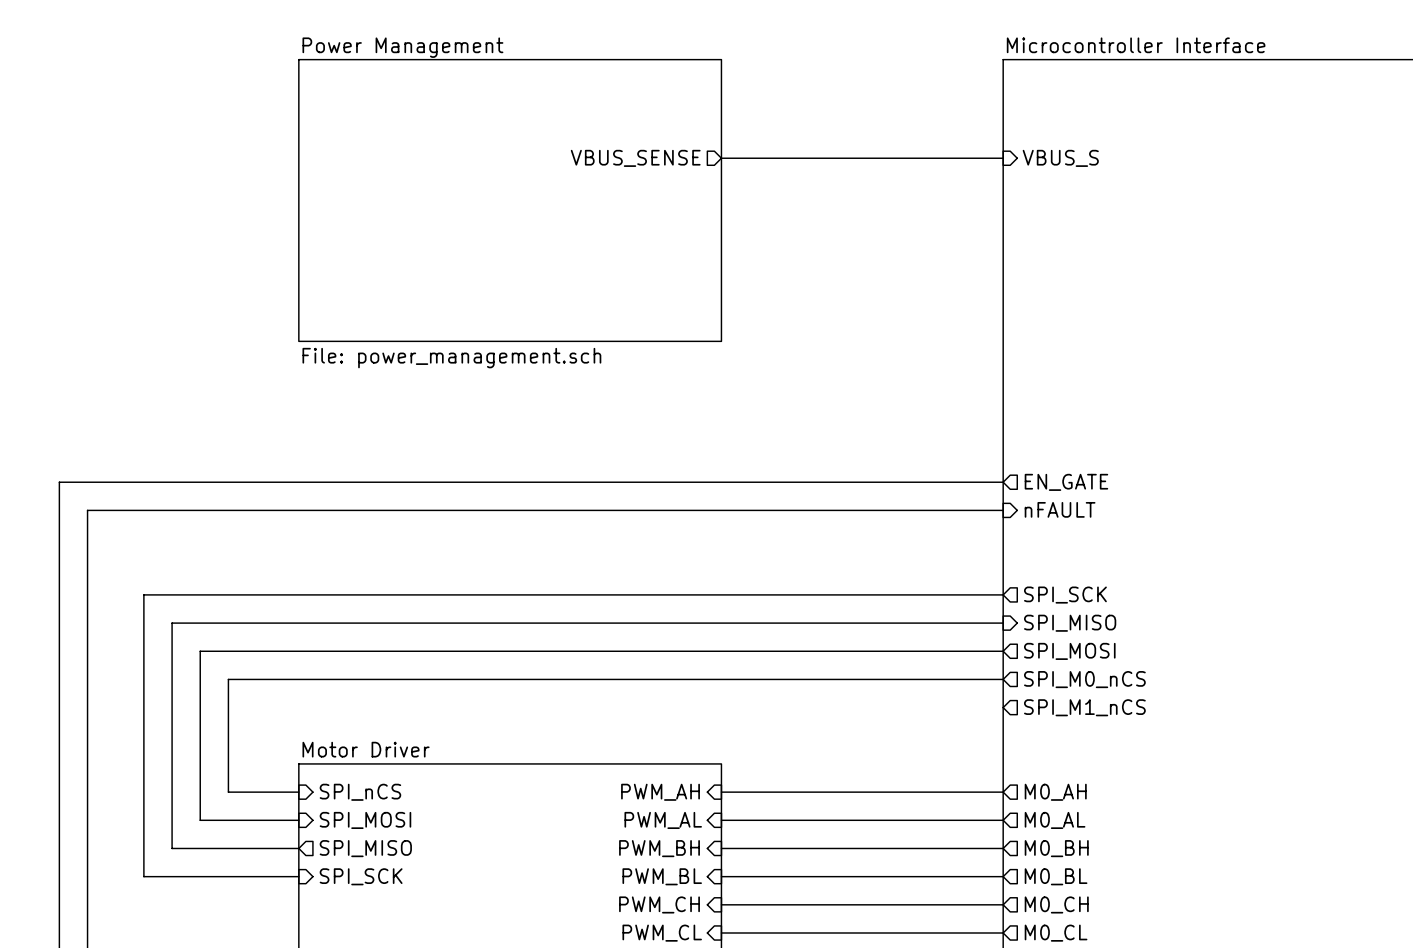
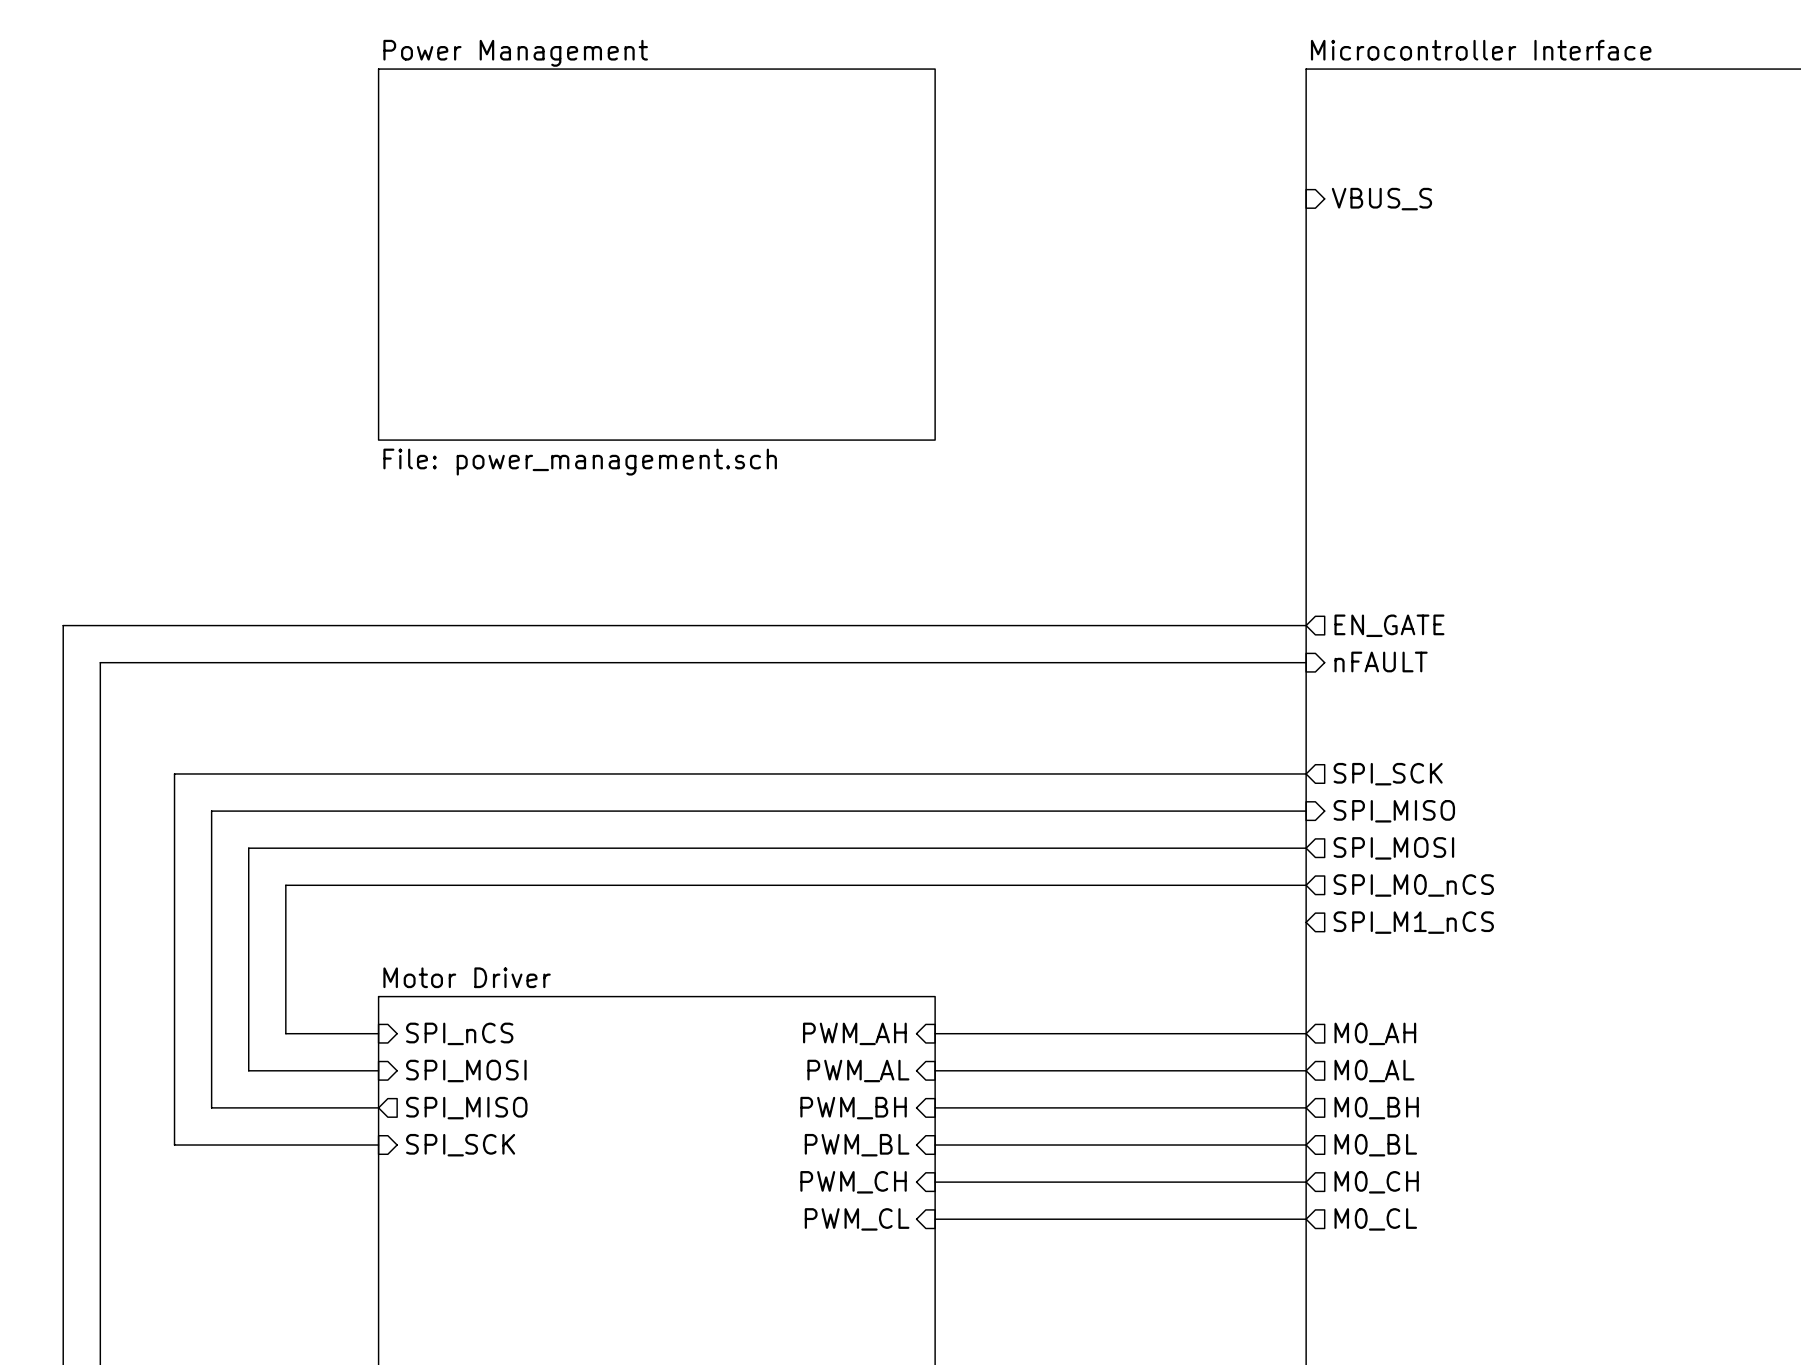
sheet pin: VBUS_SENSE (635, 158) -> none
wire: (721, 158) (1003, 158) -> none

